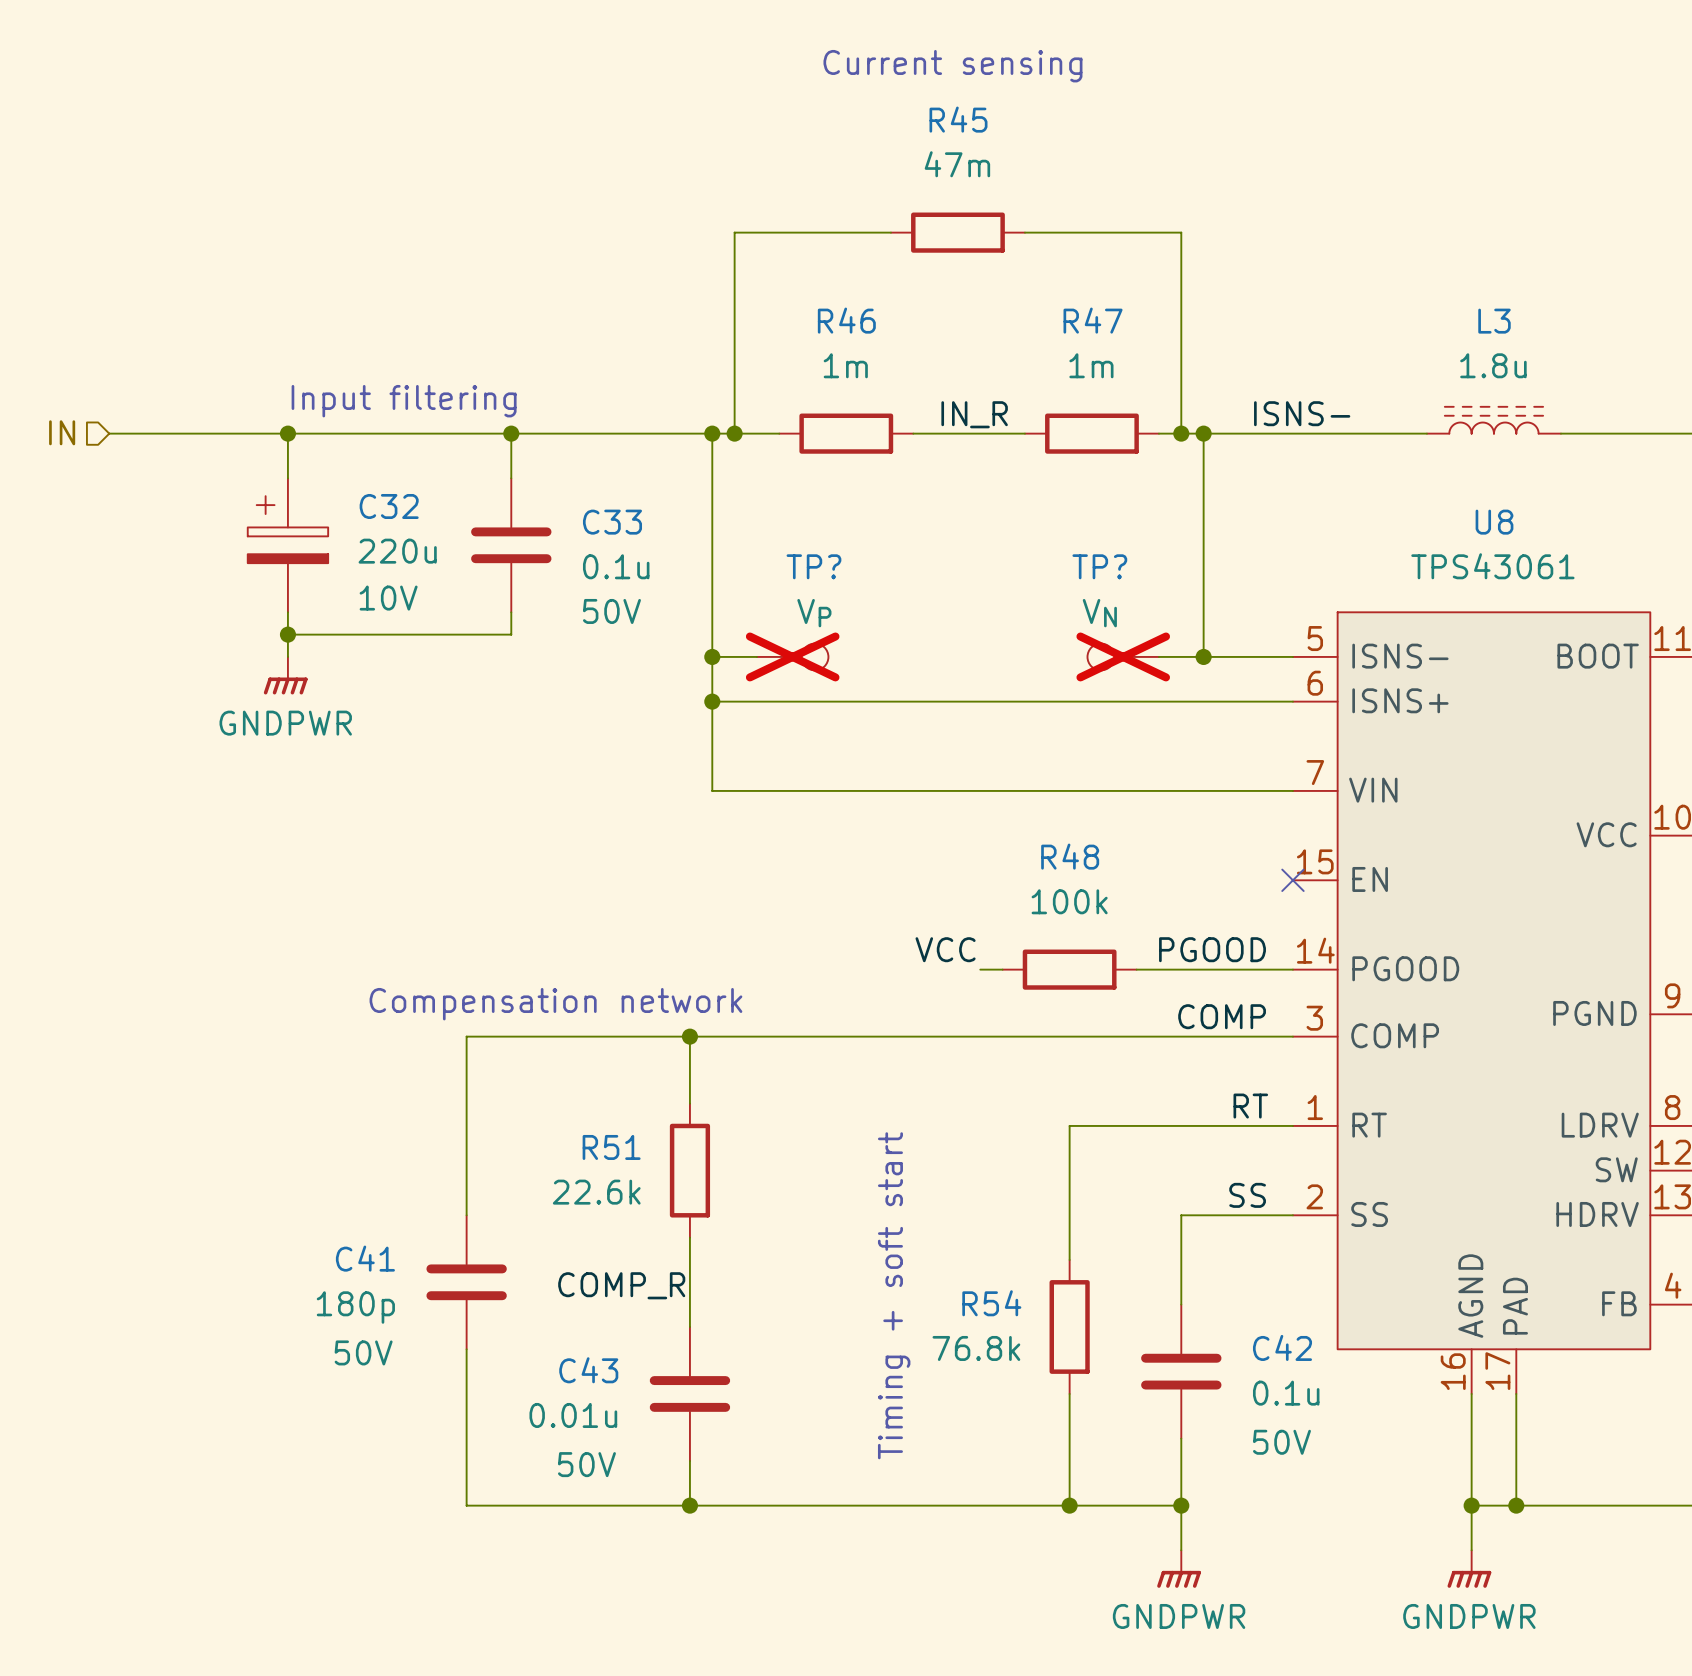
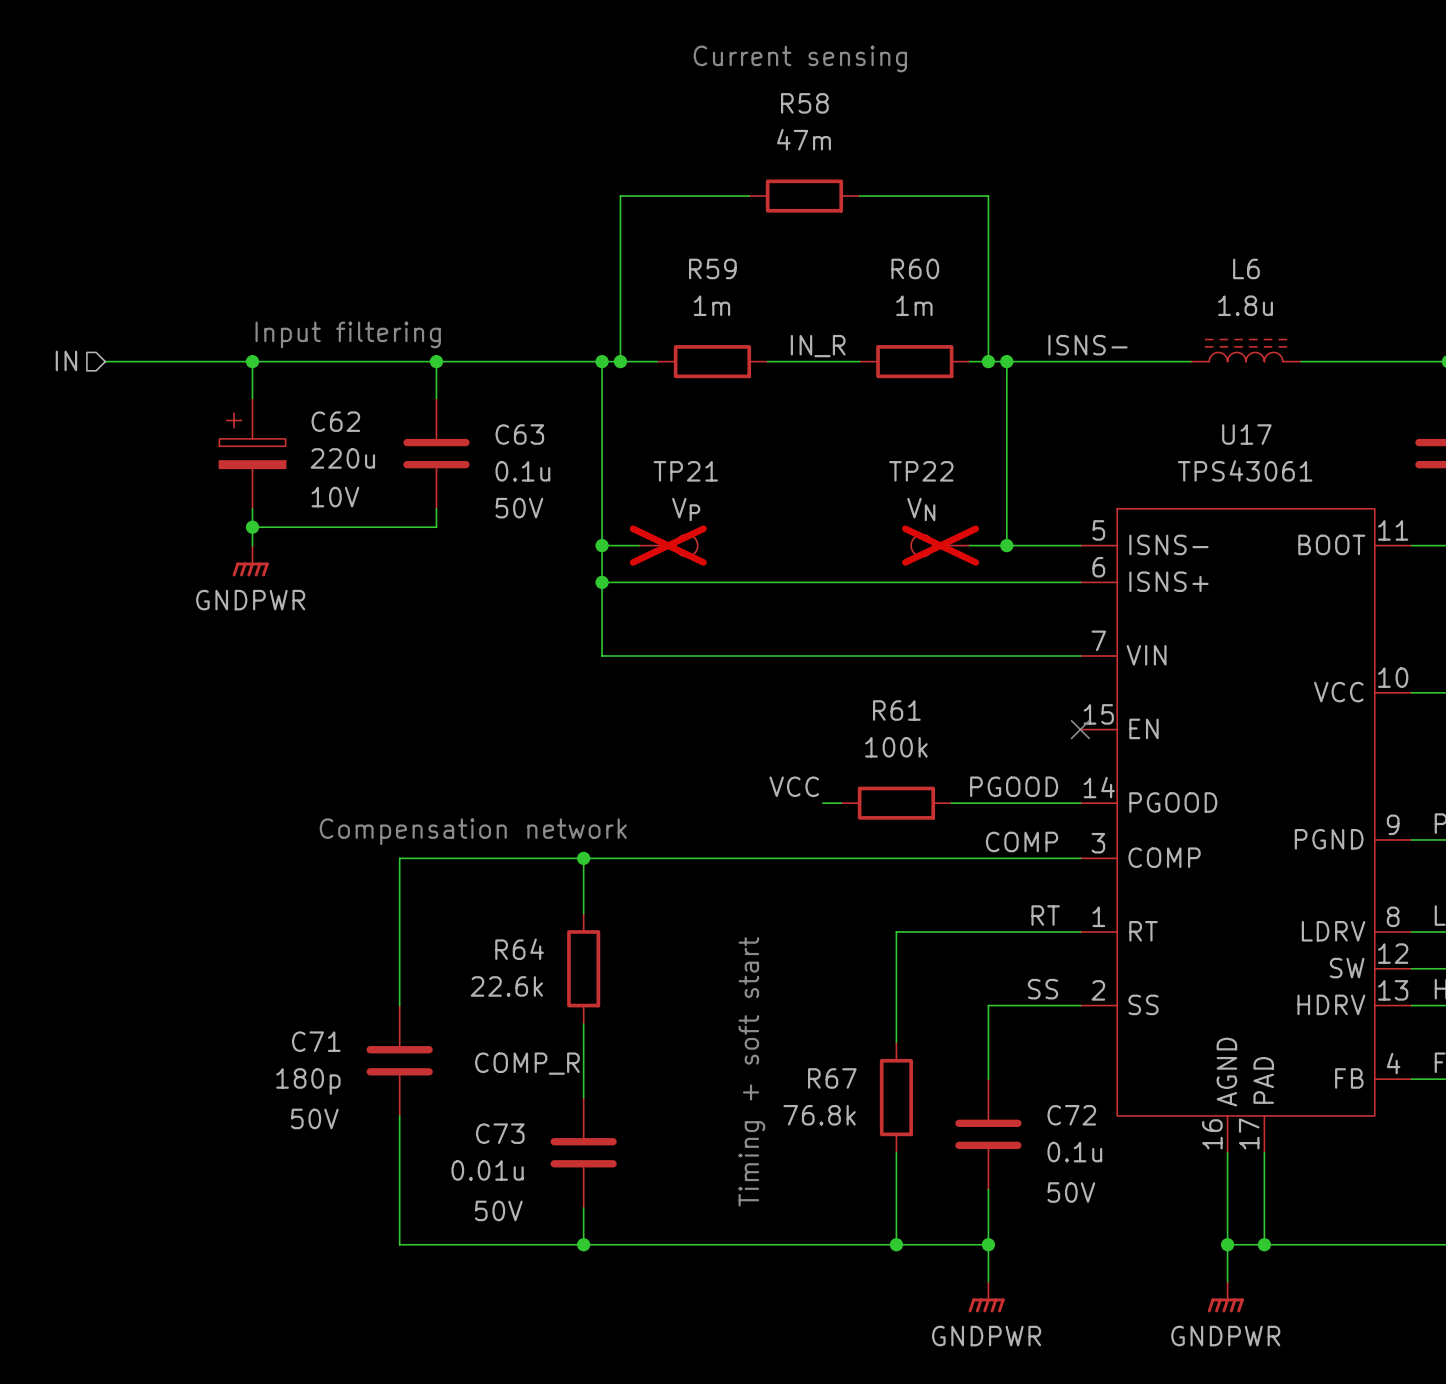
R45 name: R45 (958, 119) -> R58 (804, 103)
R46 name: R46 (846, 320) -> R59 (712, 268)
R47 name: R47 (1093, 320) -> R60 (915, 268)
L3 name: L3 (1494, 321) -> L6 (1246, 268)
C32 name: C32 (389, 506) -> C62 (335, 421)
C33 name: C33 (612, 522) -> C63 (519, 434)
U8 name: U8 (1494, 522) -> U17 (1246, 434)
TP? name: TP? (813, 566) -> TP21 (685, 471)
TP? name: TP? (1099, 566) -> TP22 (921, 471)
R48 name: R48 (1070, 856) -> R61 (896, 710)
R51 name: R51 (611, 1147) -> R64 (519, 949)
C41 name: C41 (365, 1258) -> C71 (316, 1041)
R54 name: R54 (991, 1303) -> R67 (832, 1078)
C42 name: C42 (1282, 1347) -> C72 (1071, 1115)
C43 name: C43 (588, 1370) -> C73 (500, 1133)

